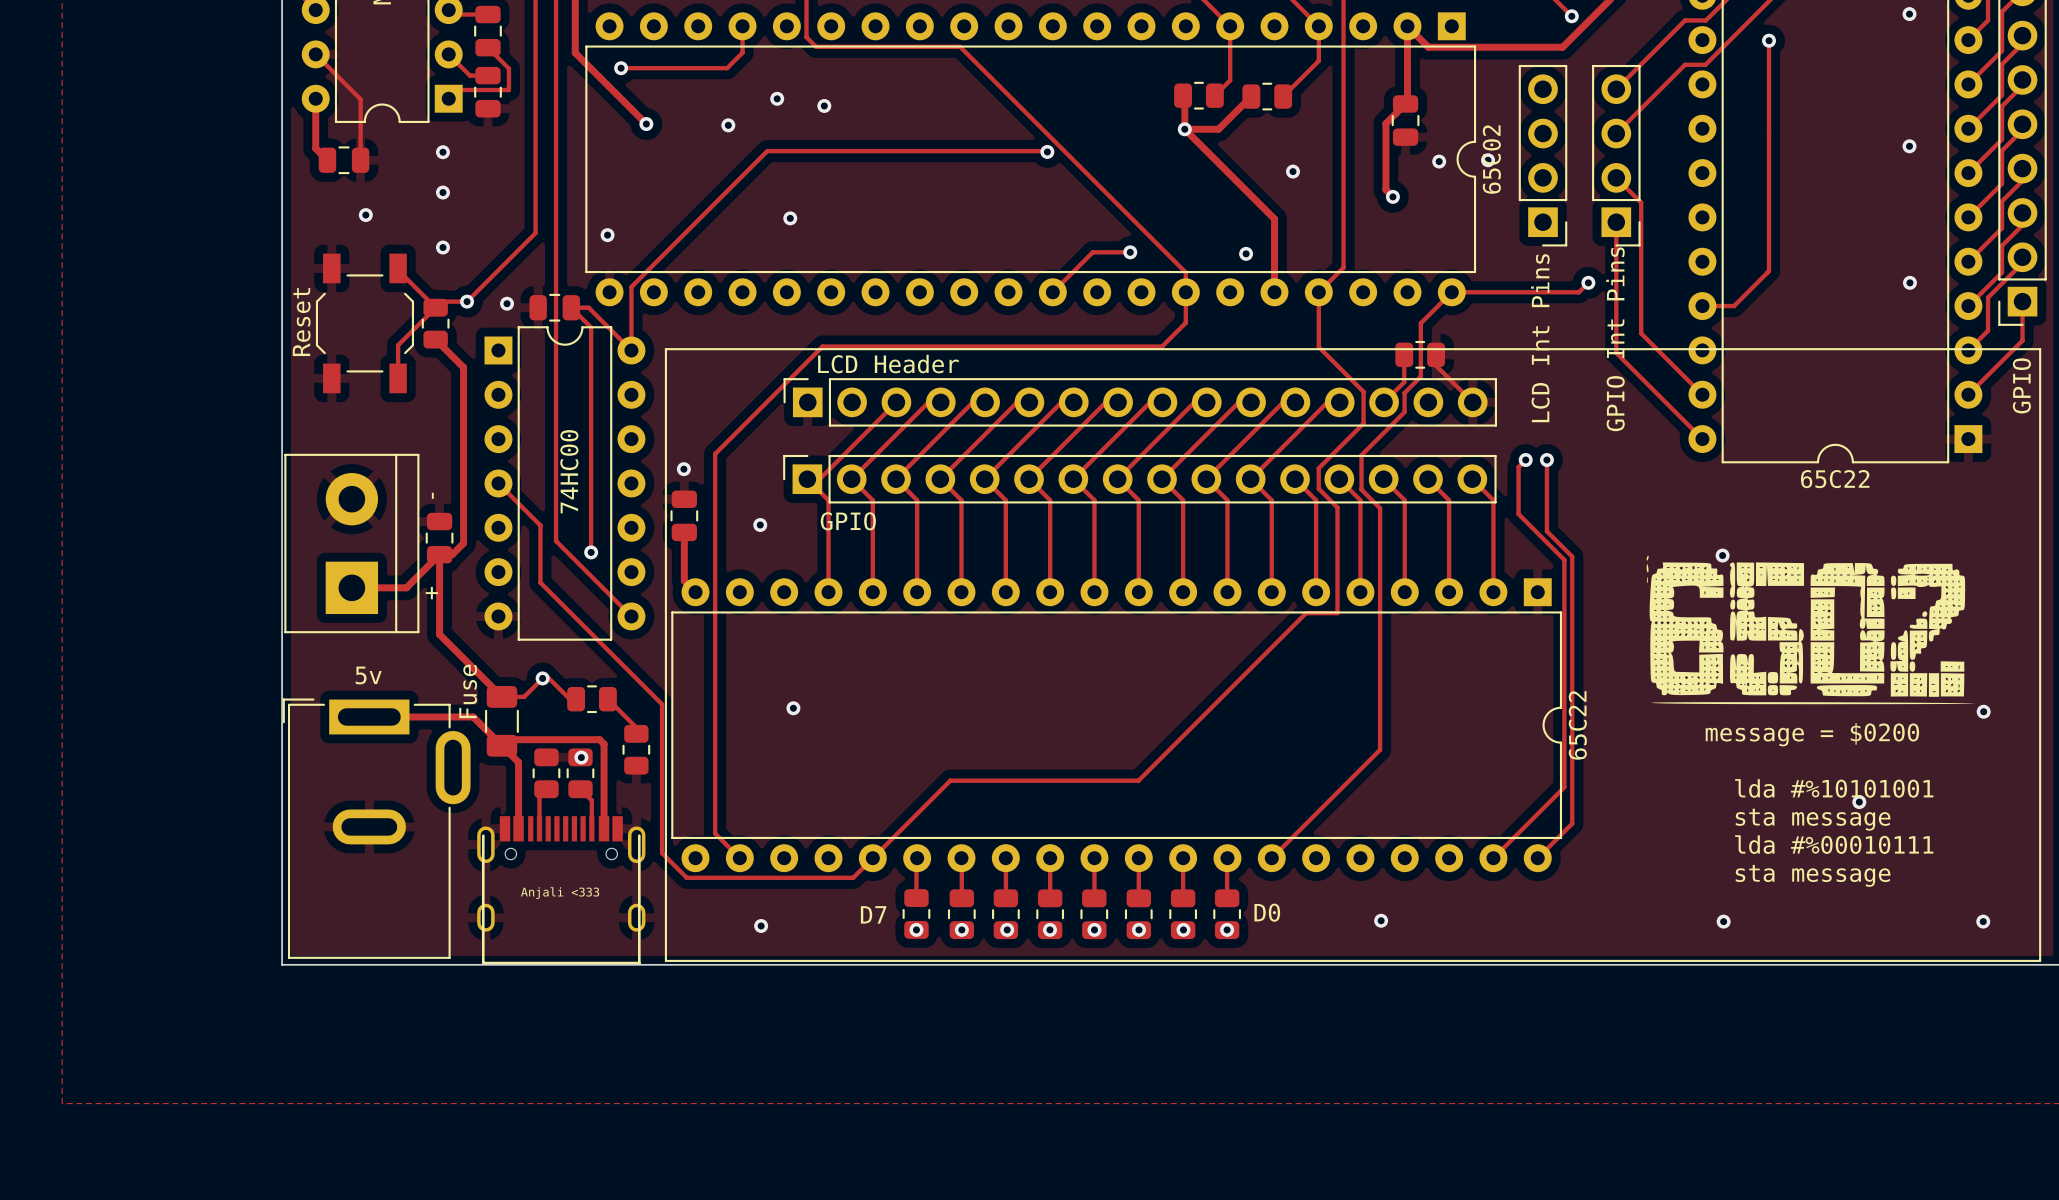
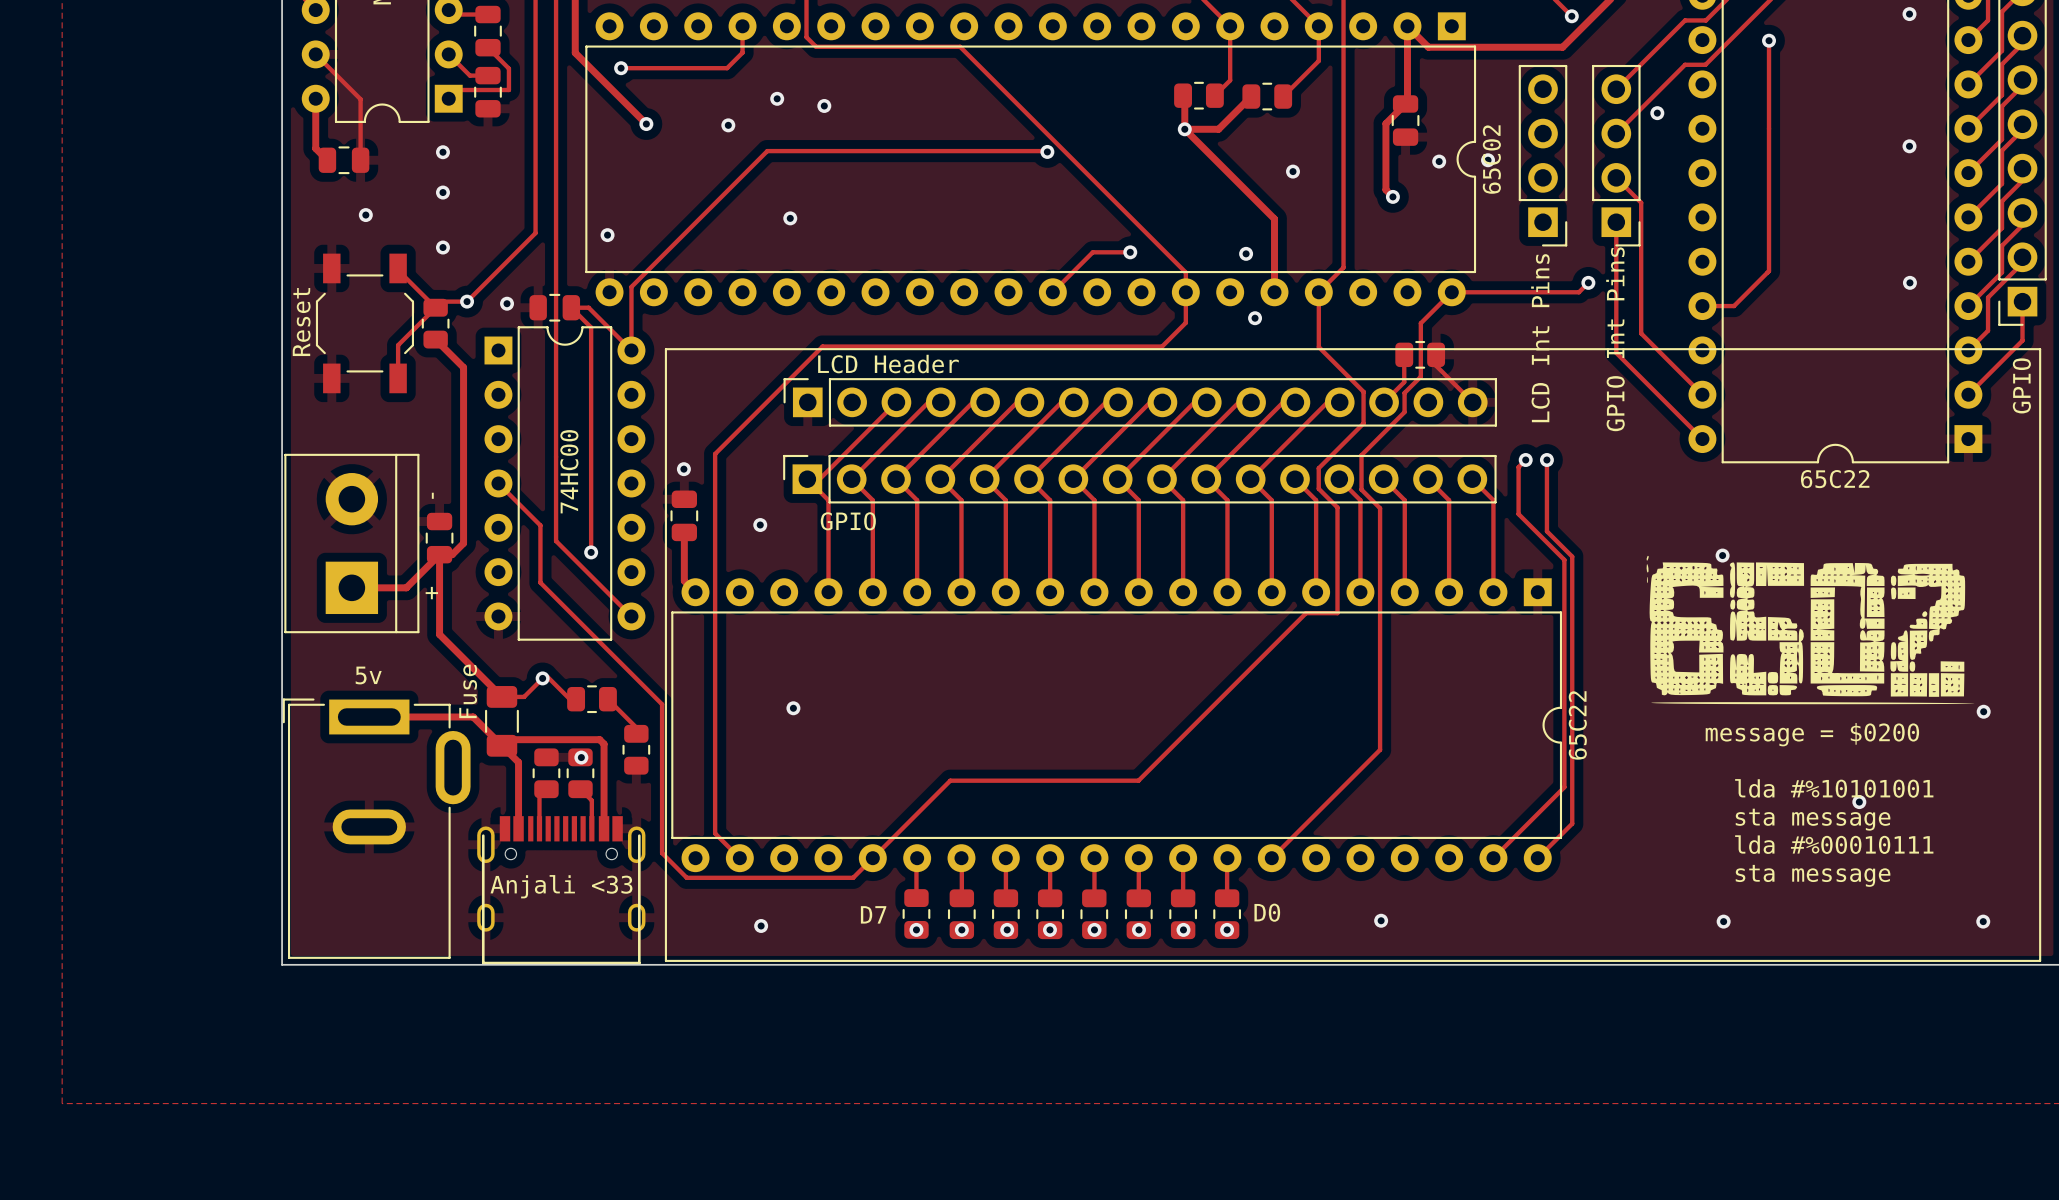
via: none -> (1657, 113)
via: none -> (1255, 318)
text: Anjali <333 (560, 893) -> Anjali <33 (561, 886)

